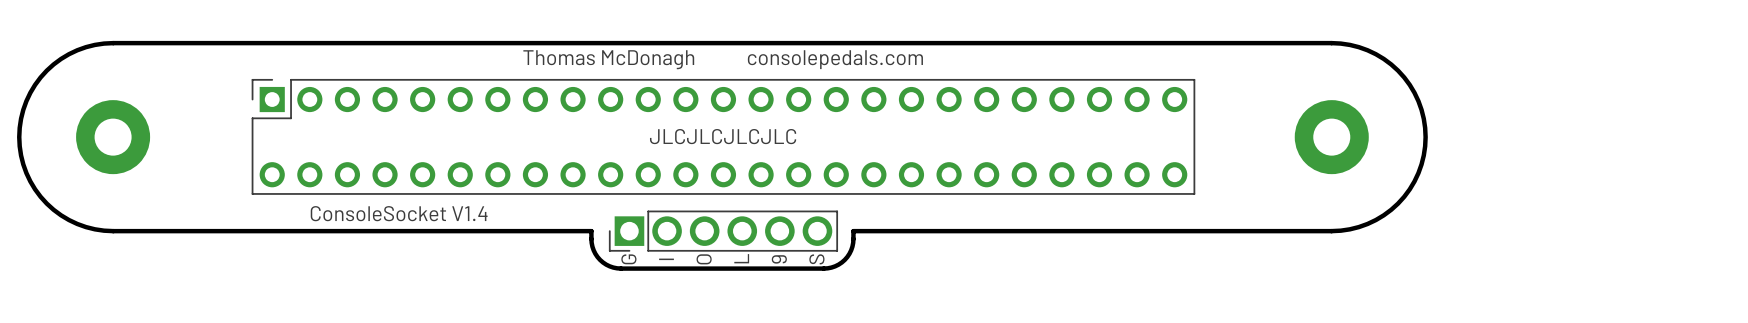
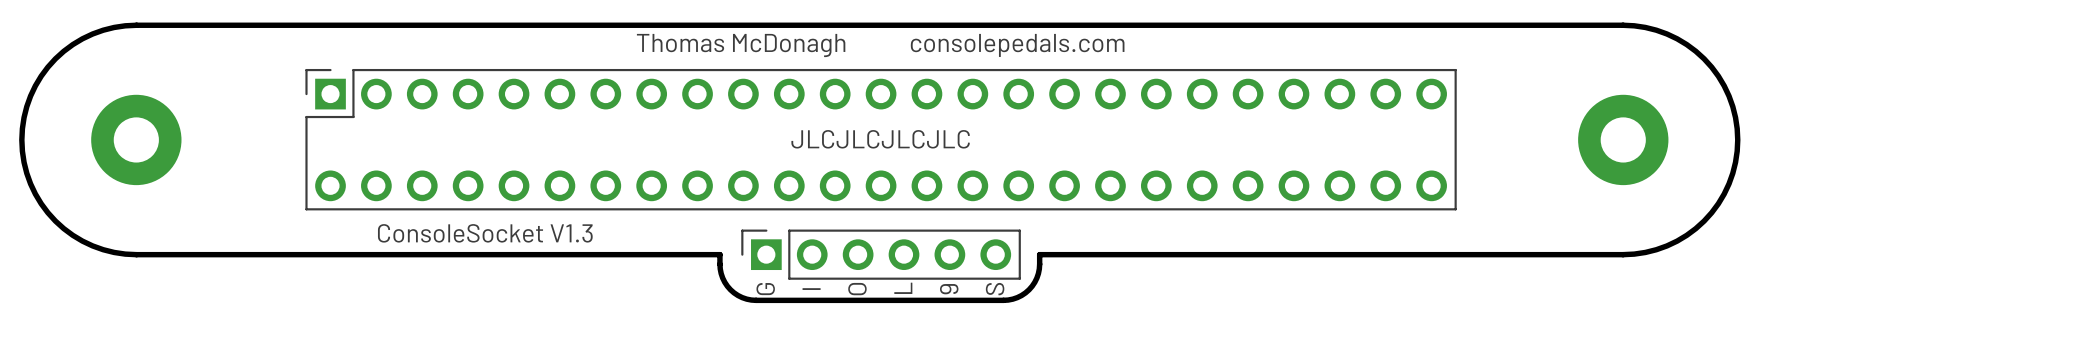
part footprint: [608, 210, 839, 252] -> [741, 229, 1021, 280]
text: ConsoleSocket V1.4 (399, 213) -> ConsoleSocket V1.3 (485, 233)

